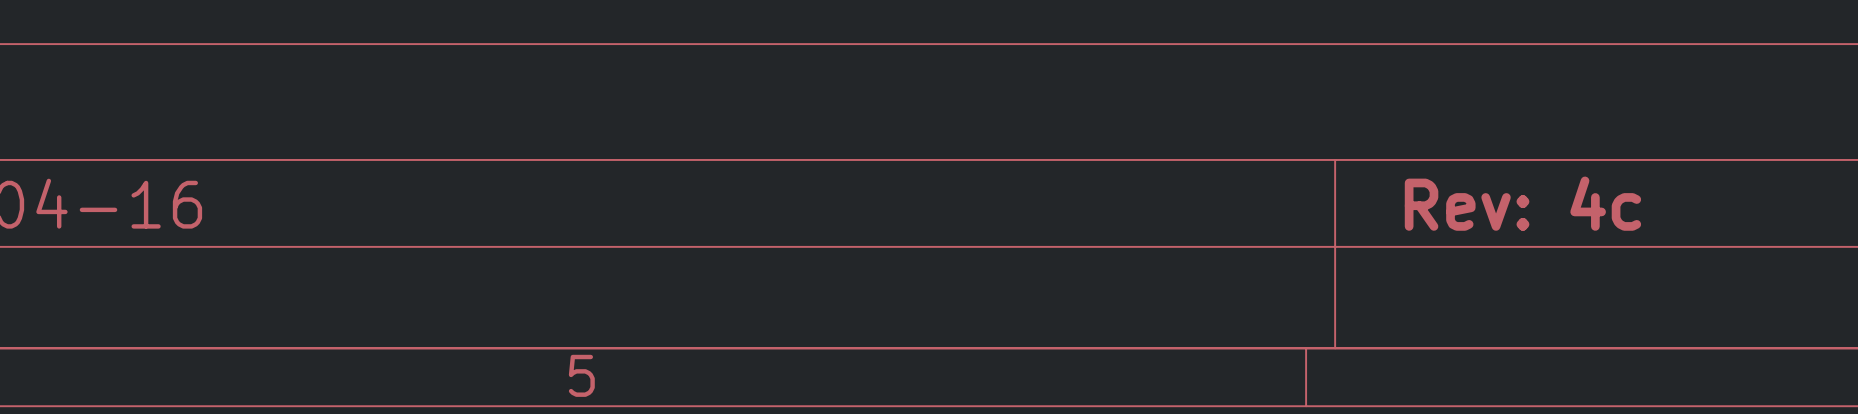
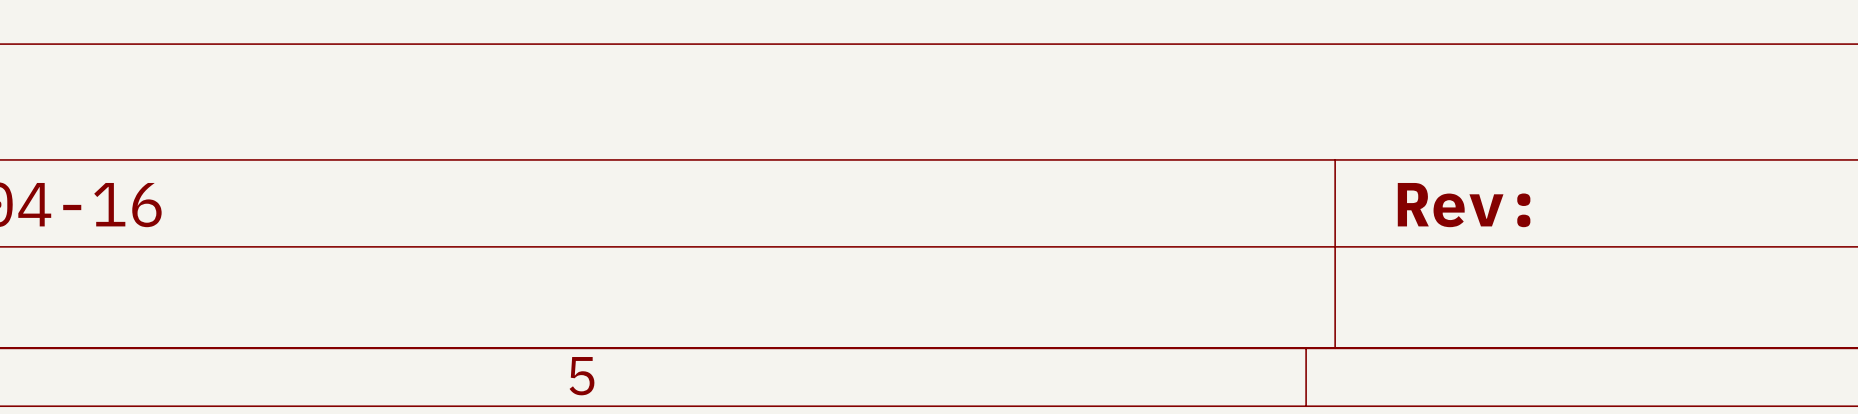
title block: Rev: 4c (1522, 203) -> Rev: (1464, 205)

